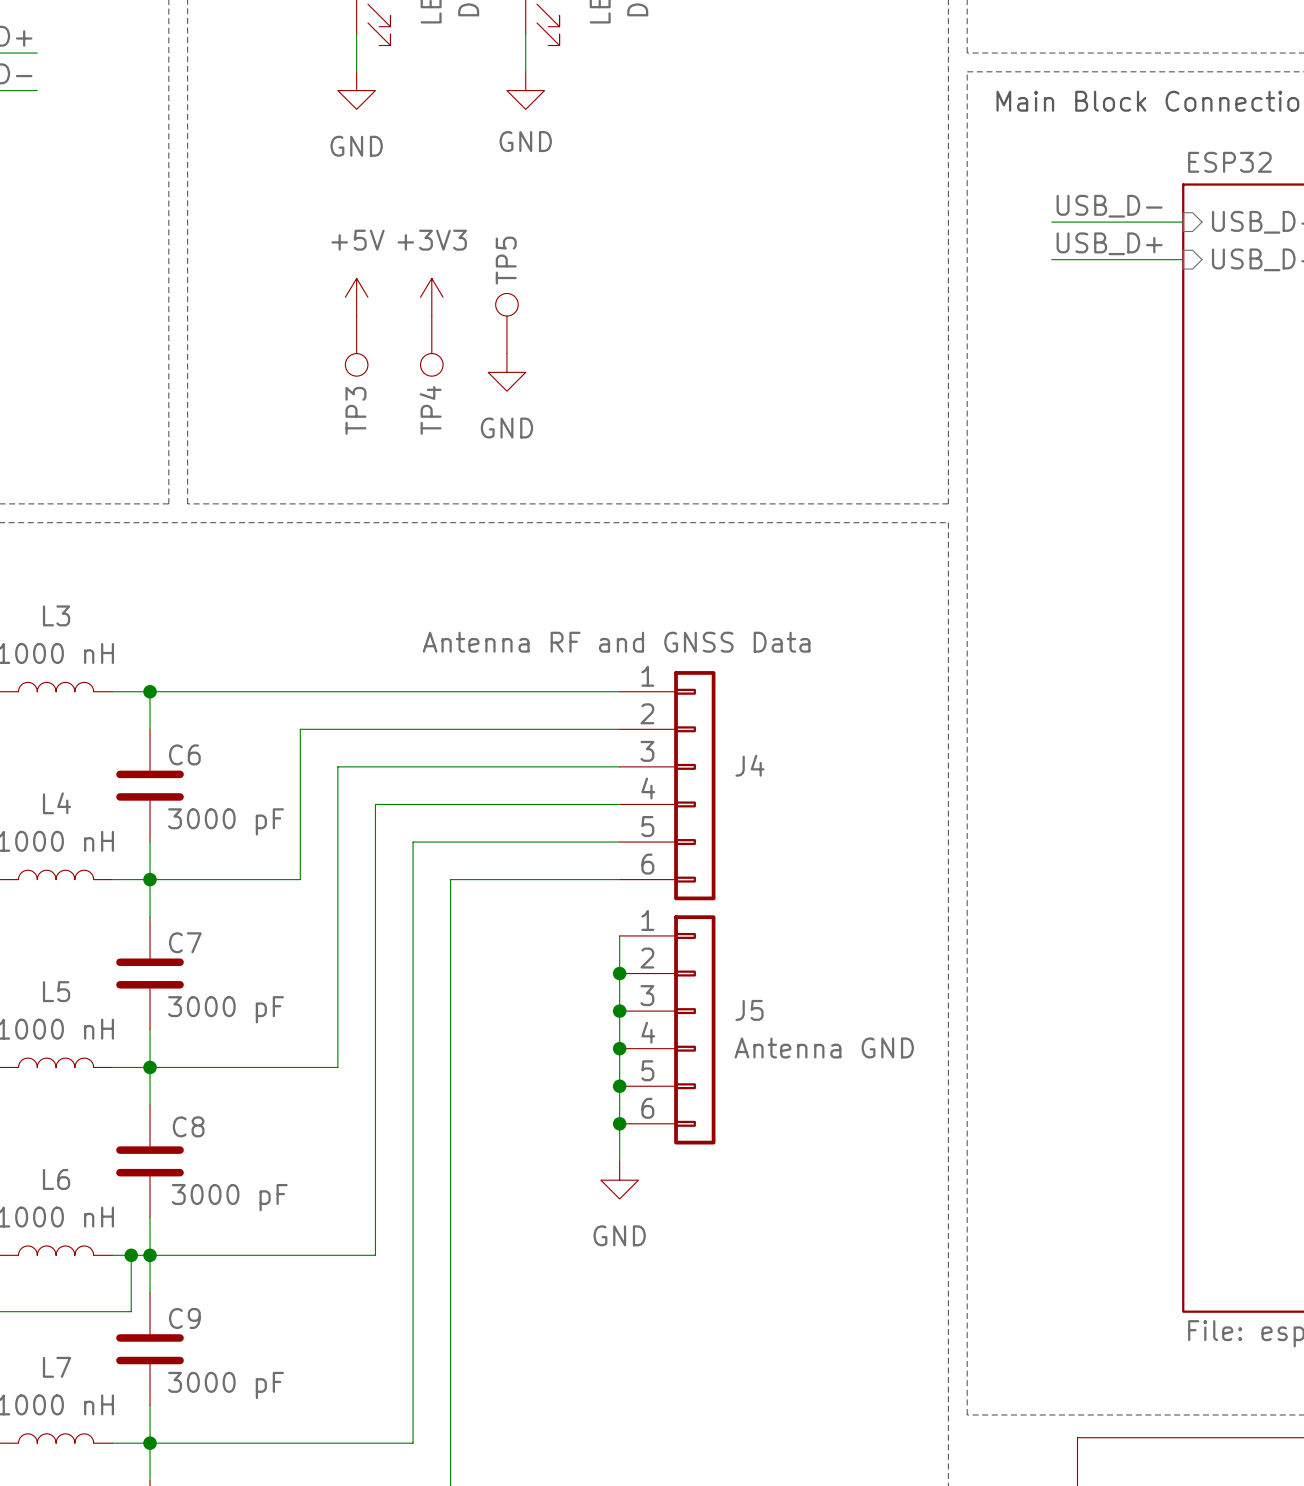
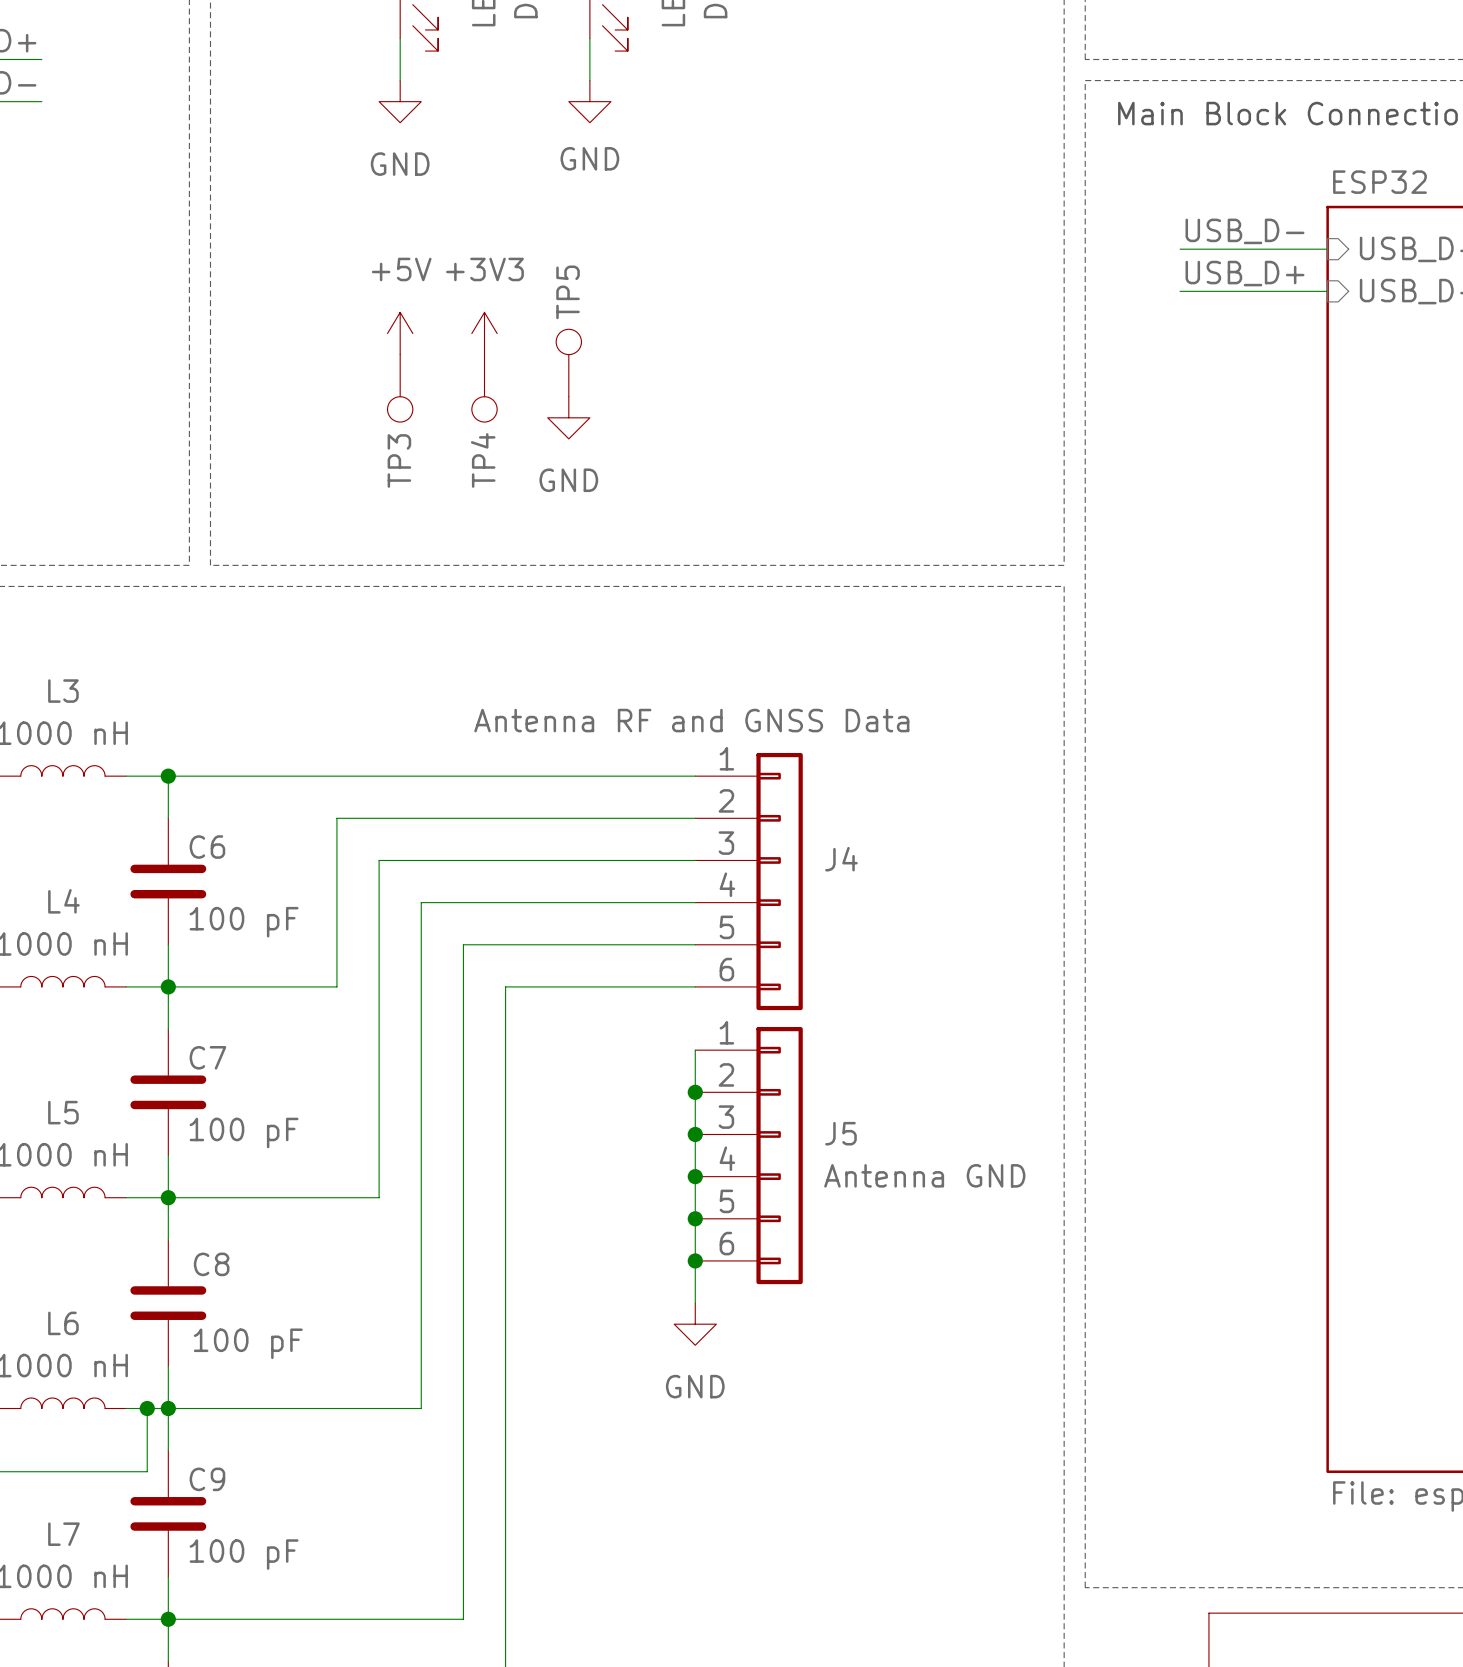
C6 value: 3000 pF (226, 821) -> 100 pF (244, 922)
C7 value: 3000 pF (226, 1009) -> 100 pF (244, 1132)
C8 value: 3000 pF (229, 1197) -> 100 pF (248, 1343)
C9 value: 3000 pF (226, 1385) -> 100 pF (244, 1554)

